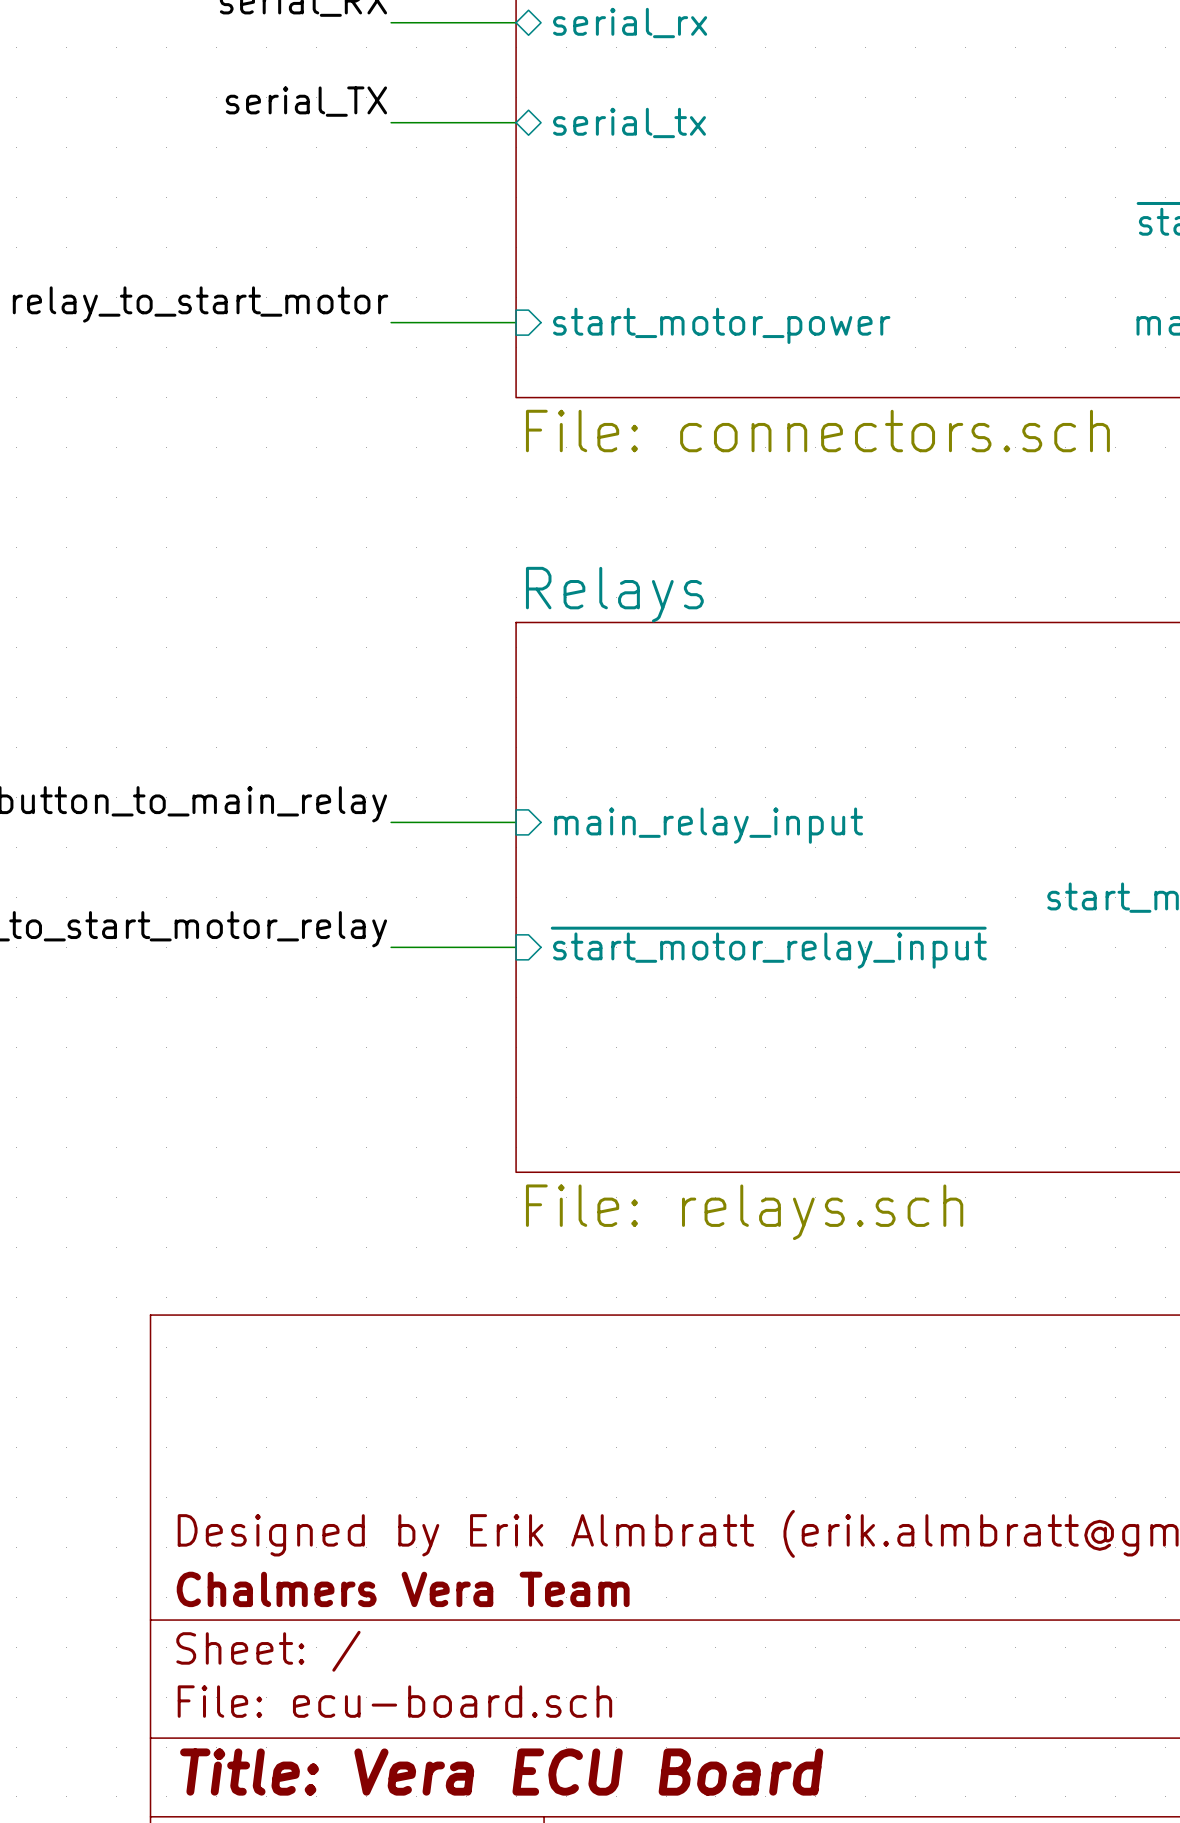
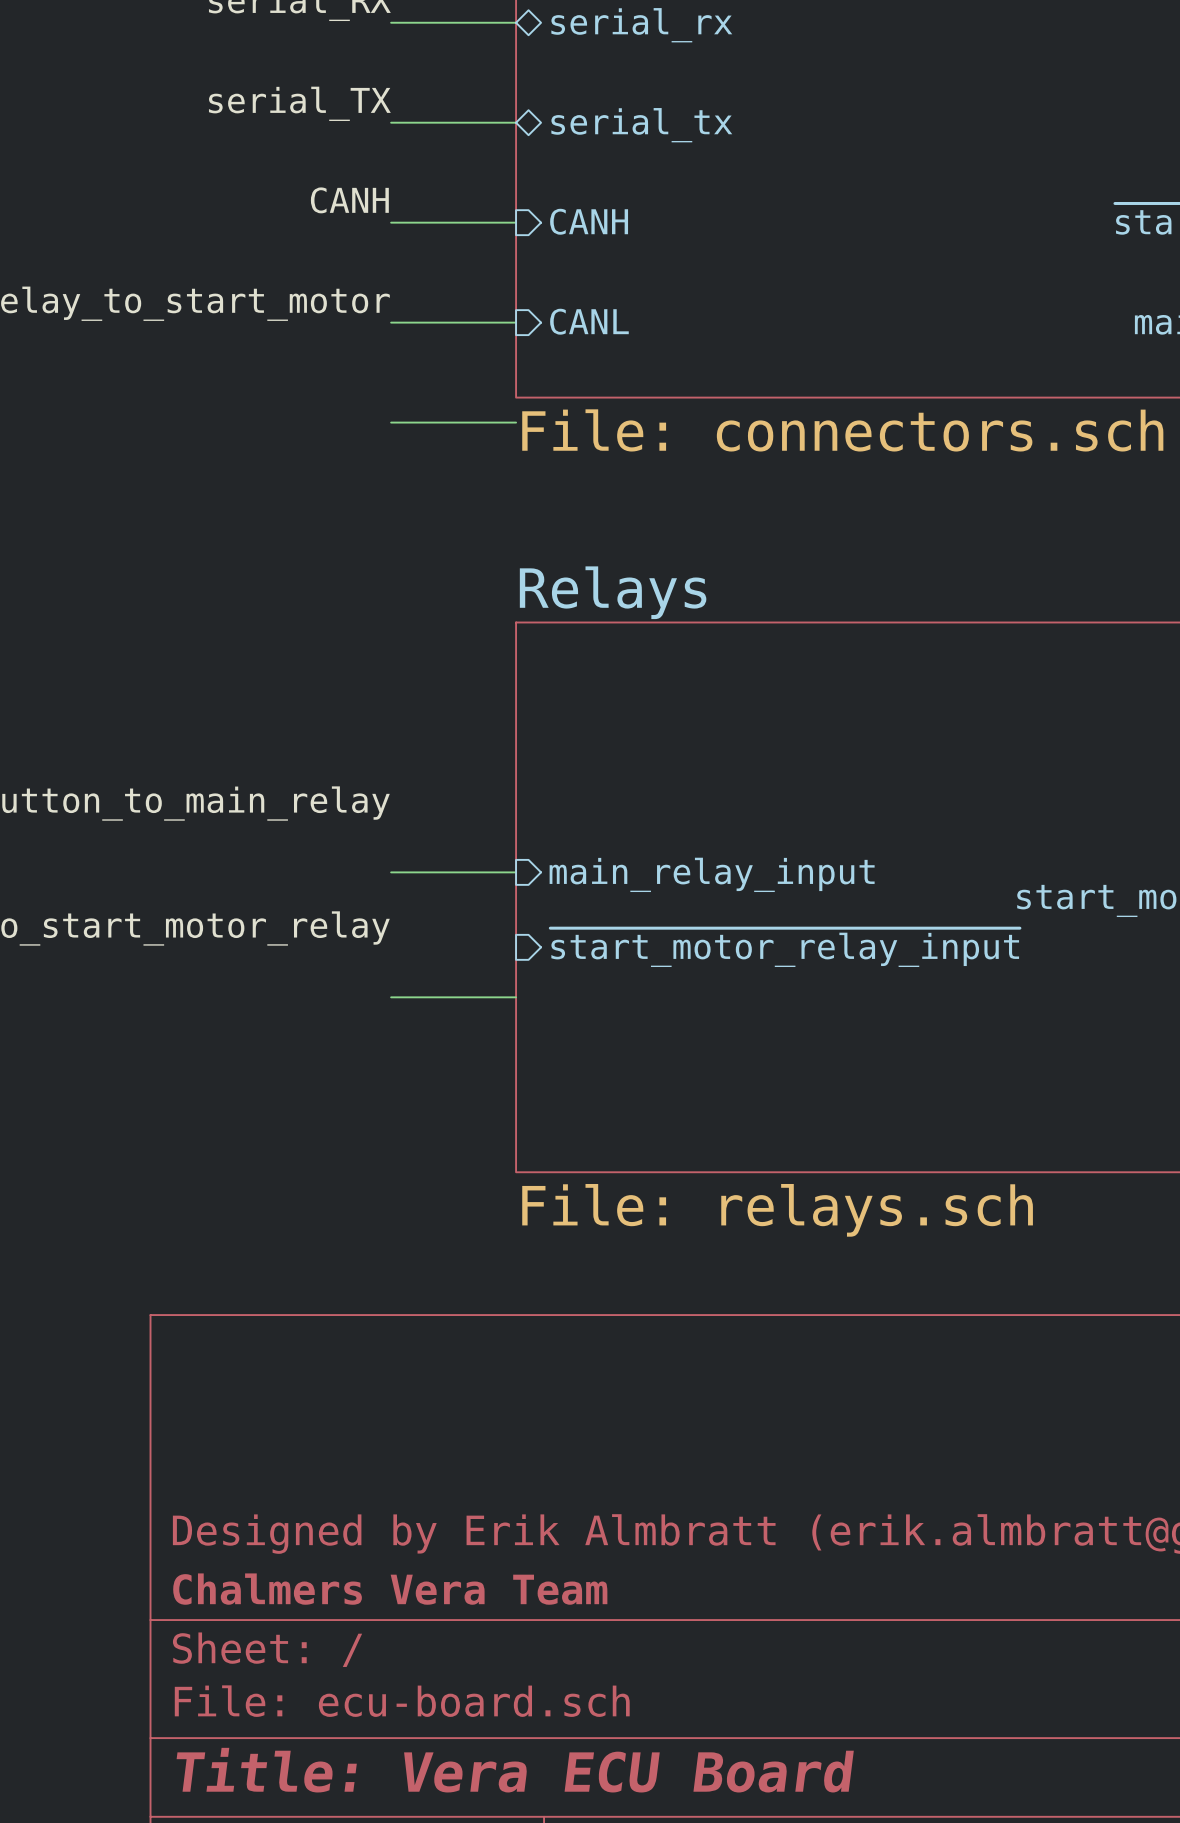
label: none -> CANH (349, 200)
sheet pin: none -> CANH (589, 221)
wire: none -> (391, 222) (516, 222)
sheet pin: start_motor_power (721, 325) -> CANL (589, 321)
wire: none -> (391, 422) (516, 422)
wire: (391, 822) (516, 822) -> (391, 872) (516, 872)
sheet pin position: main_relay_input (708, 825) -> main_relay_input (712, 874)
wire: (391, 947) (516, 947) -> (391, 997) (516, 997)

